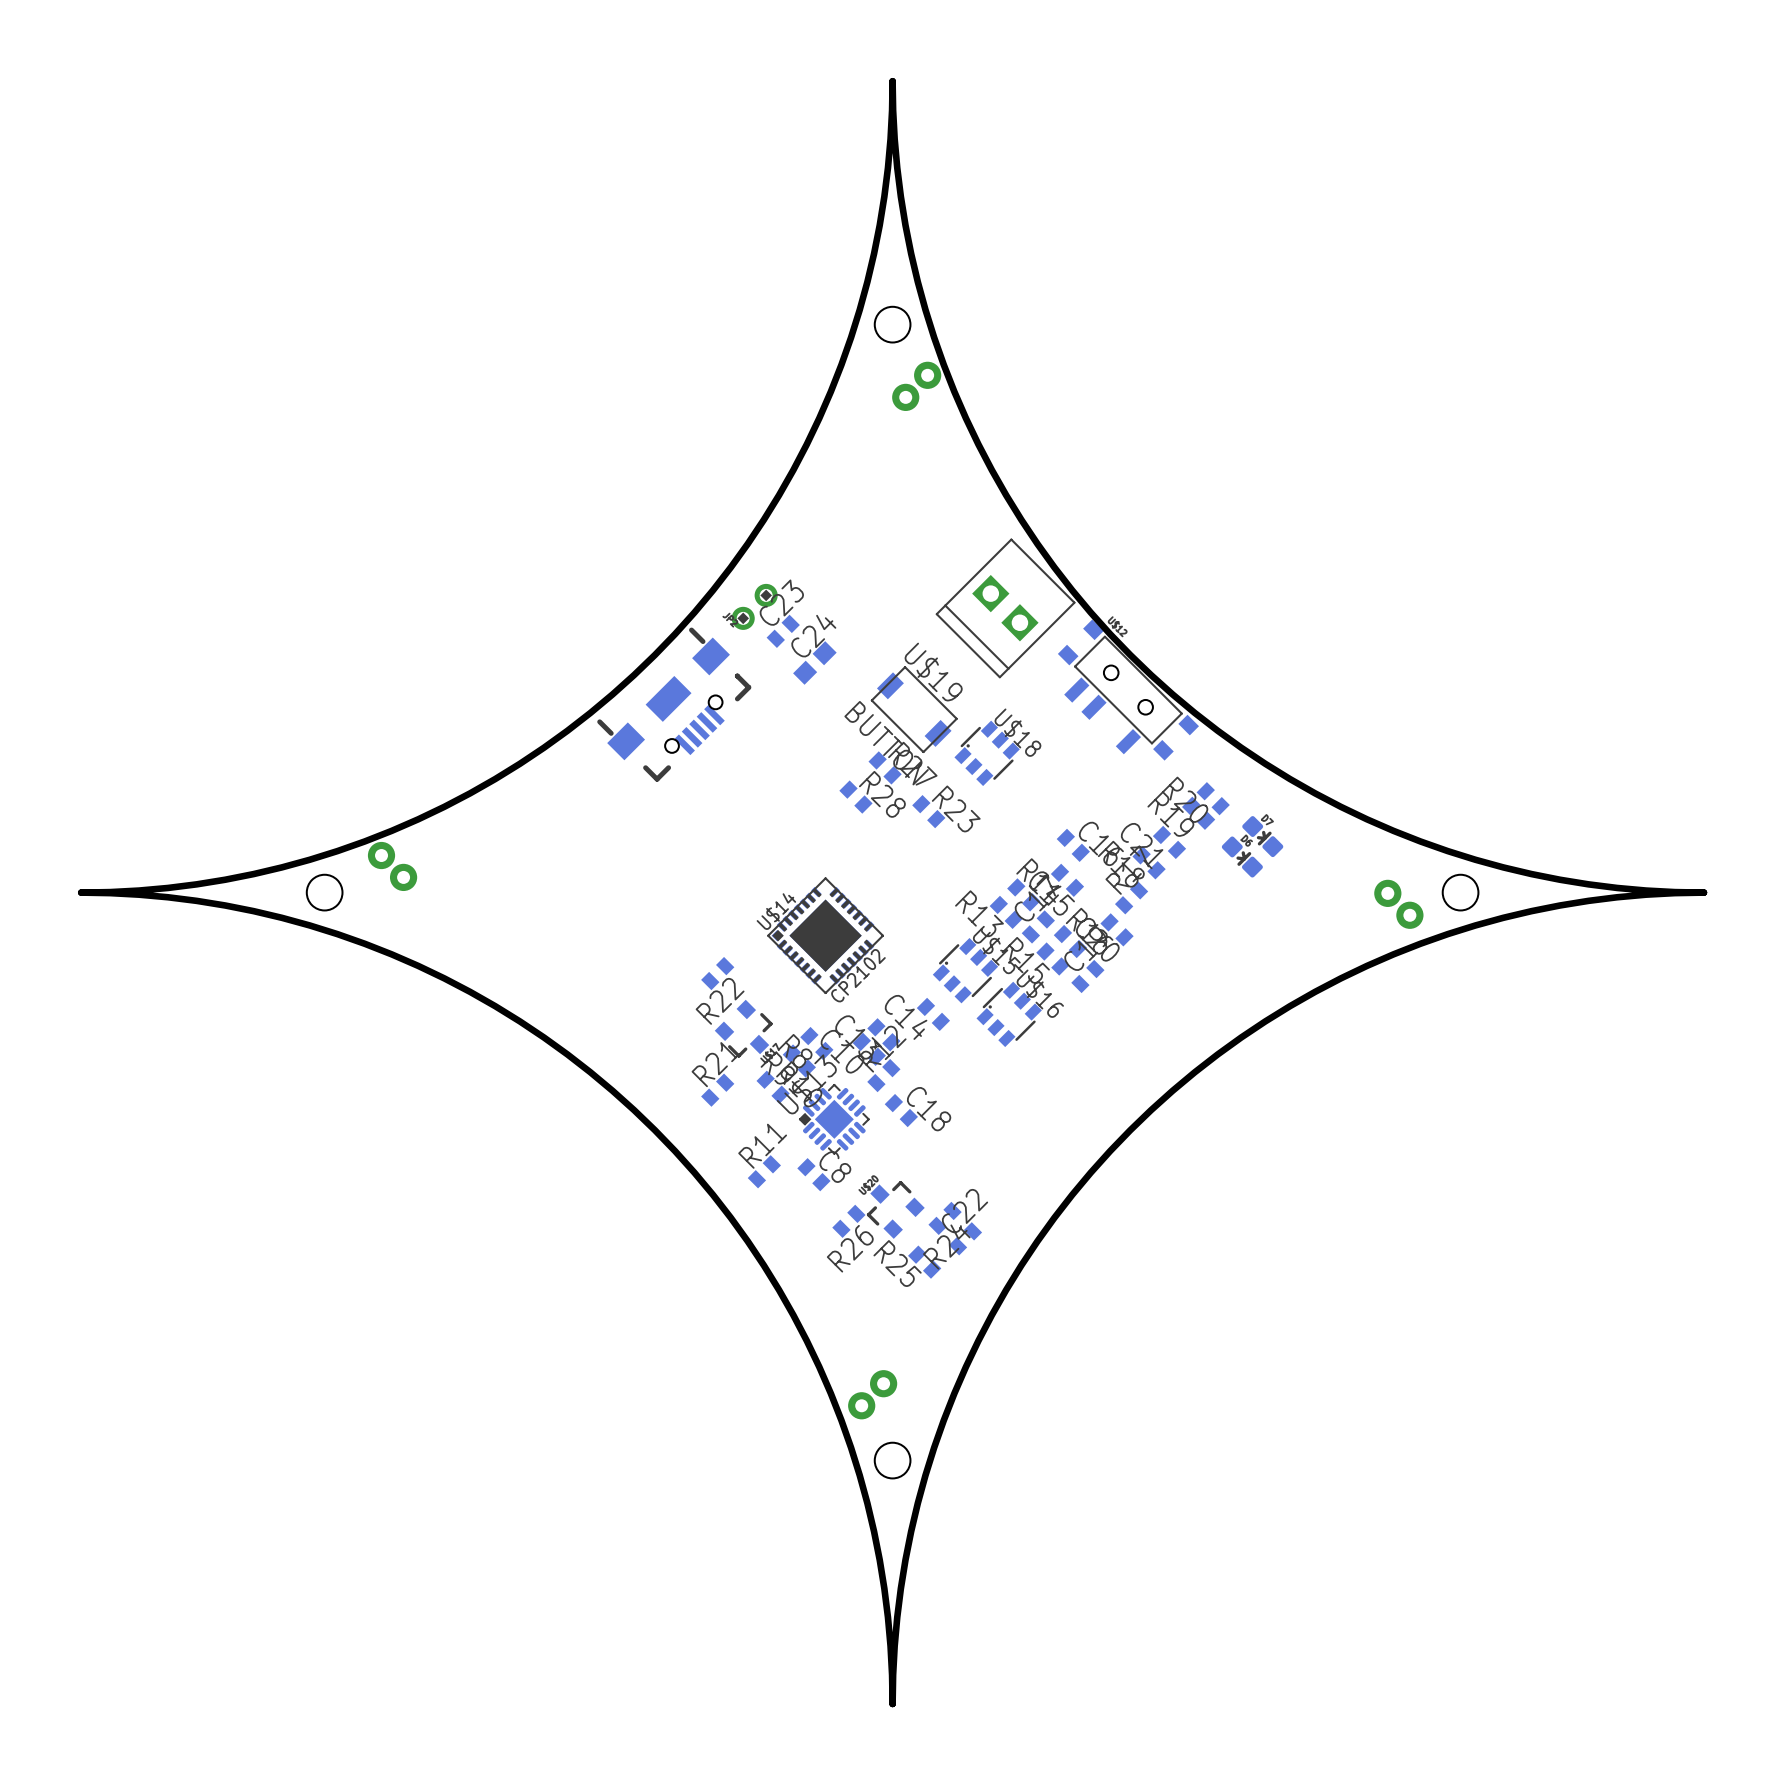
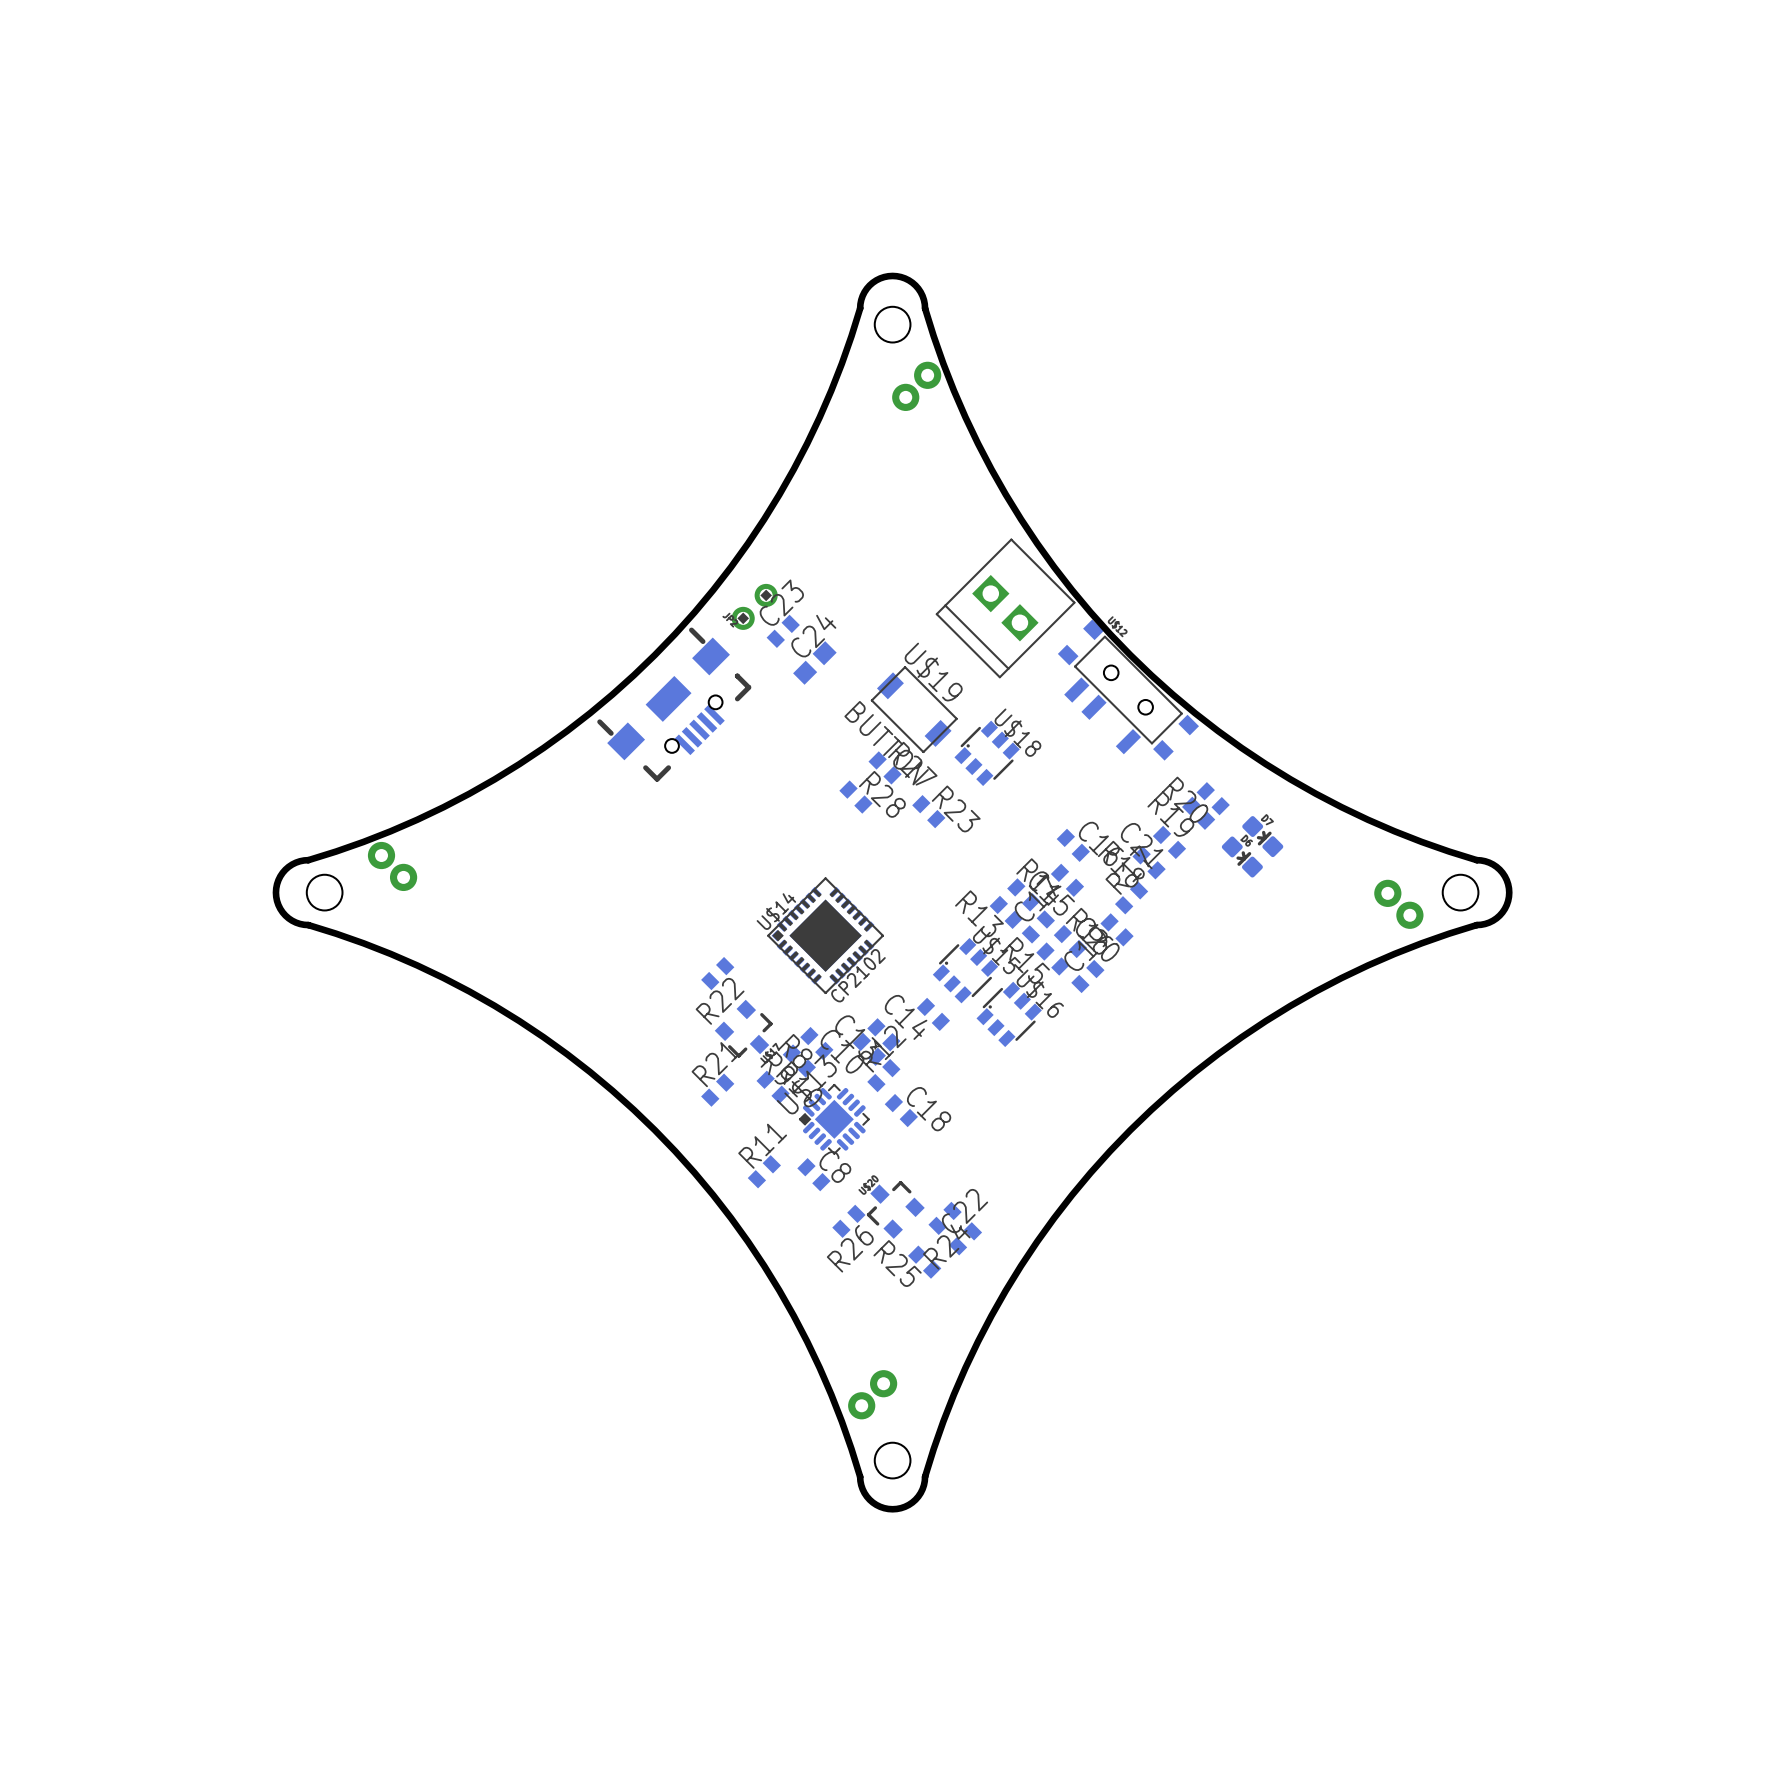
board edge: (892, 81) (894, 139) (905, 225) (925, 309) (954, 391) (978, 444) (1021, 519) (1072, 590) (1130, 654) (1194, 713) (1265, 763) (1340, 806) (1393, 830) (1475, 859) (1559, 879) (1646, 890) (1703, 892) (1646, 894) (1559, 905) (1475, 925) (1393, 954) (1340, 978) (1265, 1021) (1194, 1072) (1130, 1130) (1072, 1194) (1021, 1265) (978, 1340) (954, 1393) (925, 1475) (905, 1559) (894, 1646) (892, 1703) (890, 1646) (879, 1559) (859, 1475) (830, 1393) (806, 1340) (763, 1265) (713, 1194) (654, 1130) (590, 1072) (519, 1021) (444, 978) (391, 954) (309, 925) (225, 905) (139, 894) (81, 892) (139, 890) (225, 879) (309, 859) (391, 830) (444, 806) (519, 763) (590, 713) (654, 654) (713, 590) (763, 519) (806, 444) (830, 391) (859, 309) (879, 225) (890, 139) (892, 81) -> (925, 308) (953, 390) (978, 443) (1005, 494) (1037, 543) (1072, 590) (1130, 654) (1195, 713) (1265, 764) (1315, 793) (1367, 819) (1421, 841) (1493, 864) (1504, 876) (1509, 892) (1504, 908) (1493, 920) (1421, 943) (1367, 965) (1315, 991) (1265, 1021) (1195, 1072) (1130, 1130) (1072, 1195) (1021, 1265) (991, 1315) (965, 1367) (943, 1421) (920, 1493) (908, 1504) (892, 1509) (876, 1504) (864, 1493) (841, 1421) (819, 1367) (793, 1315) (764, 1265) (713, 1195) (654, 1130) (590, 1072) (519, 1021) (469, 991) (417, 965) (363, 943) (292, 920) (280, 908) (275, 892) (280, 876) (292, 864) (336, 851) (390, 831) (443, 807) (494, 779) (567, 731) (634, 675) (675, 634) (713, 590) (748, 543) (779, 494) (807, 443) (831, 390) (851, 336) (862, 296) (866, 288) (876, 280) (884, 277) (896, 276) (905, 278) (915, 285) (920, 292) (925, 308)

